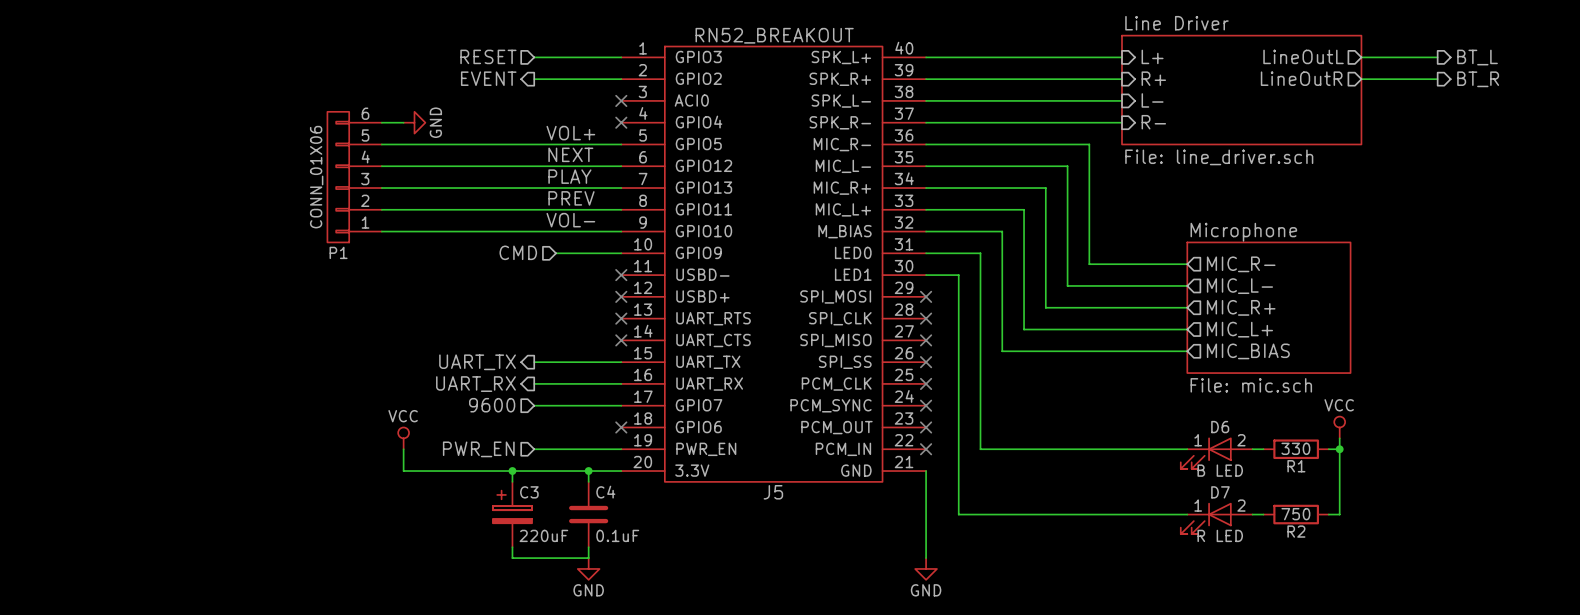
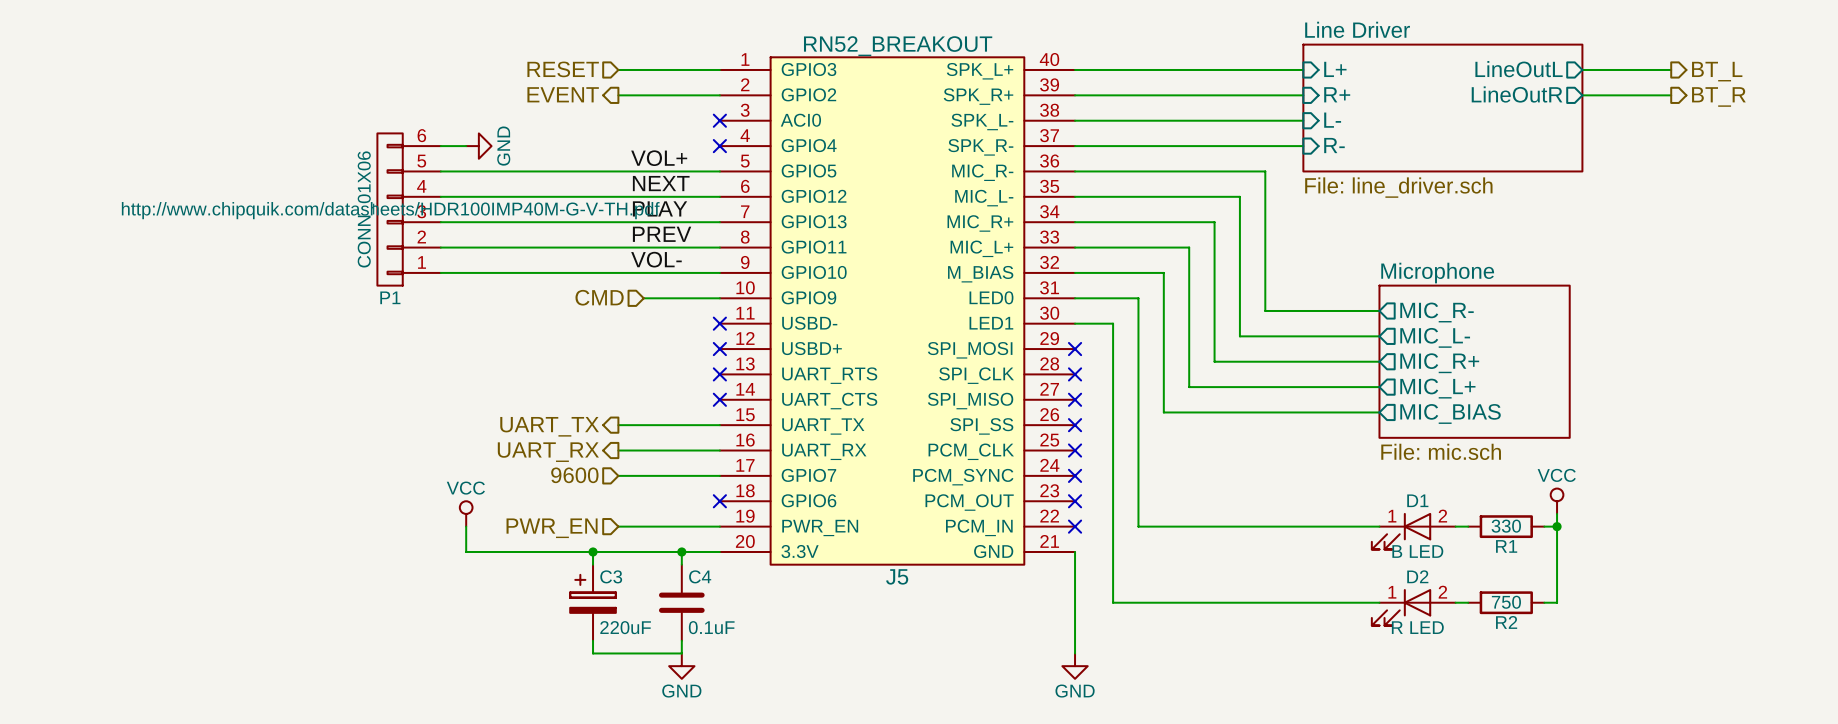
P1 text: none -> http://www.chipquik.com/datasheets/HDR100IMP40M-G-V-TH.pdf (390, 210)
D6 name: D6 (1220, 427) -> D1 (1417, 500)
D7 name: D7 (1220, 492) -> D2 (1417, 576)

